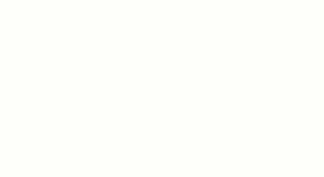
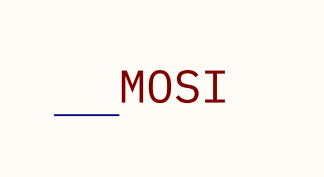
label: none -> MOSI (173, 86)
wire: none -> (54, 115) (118, 115)

